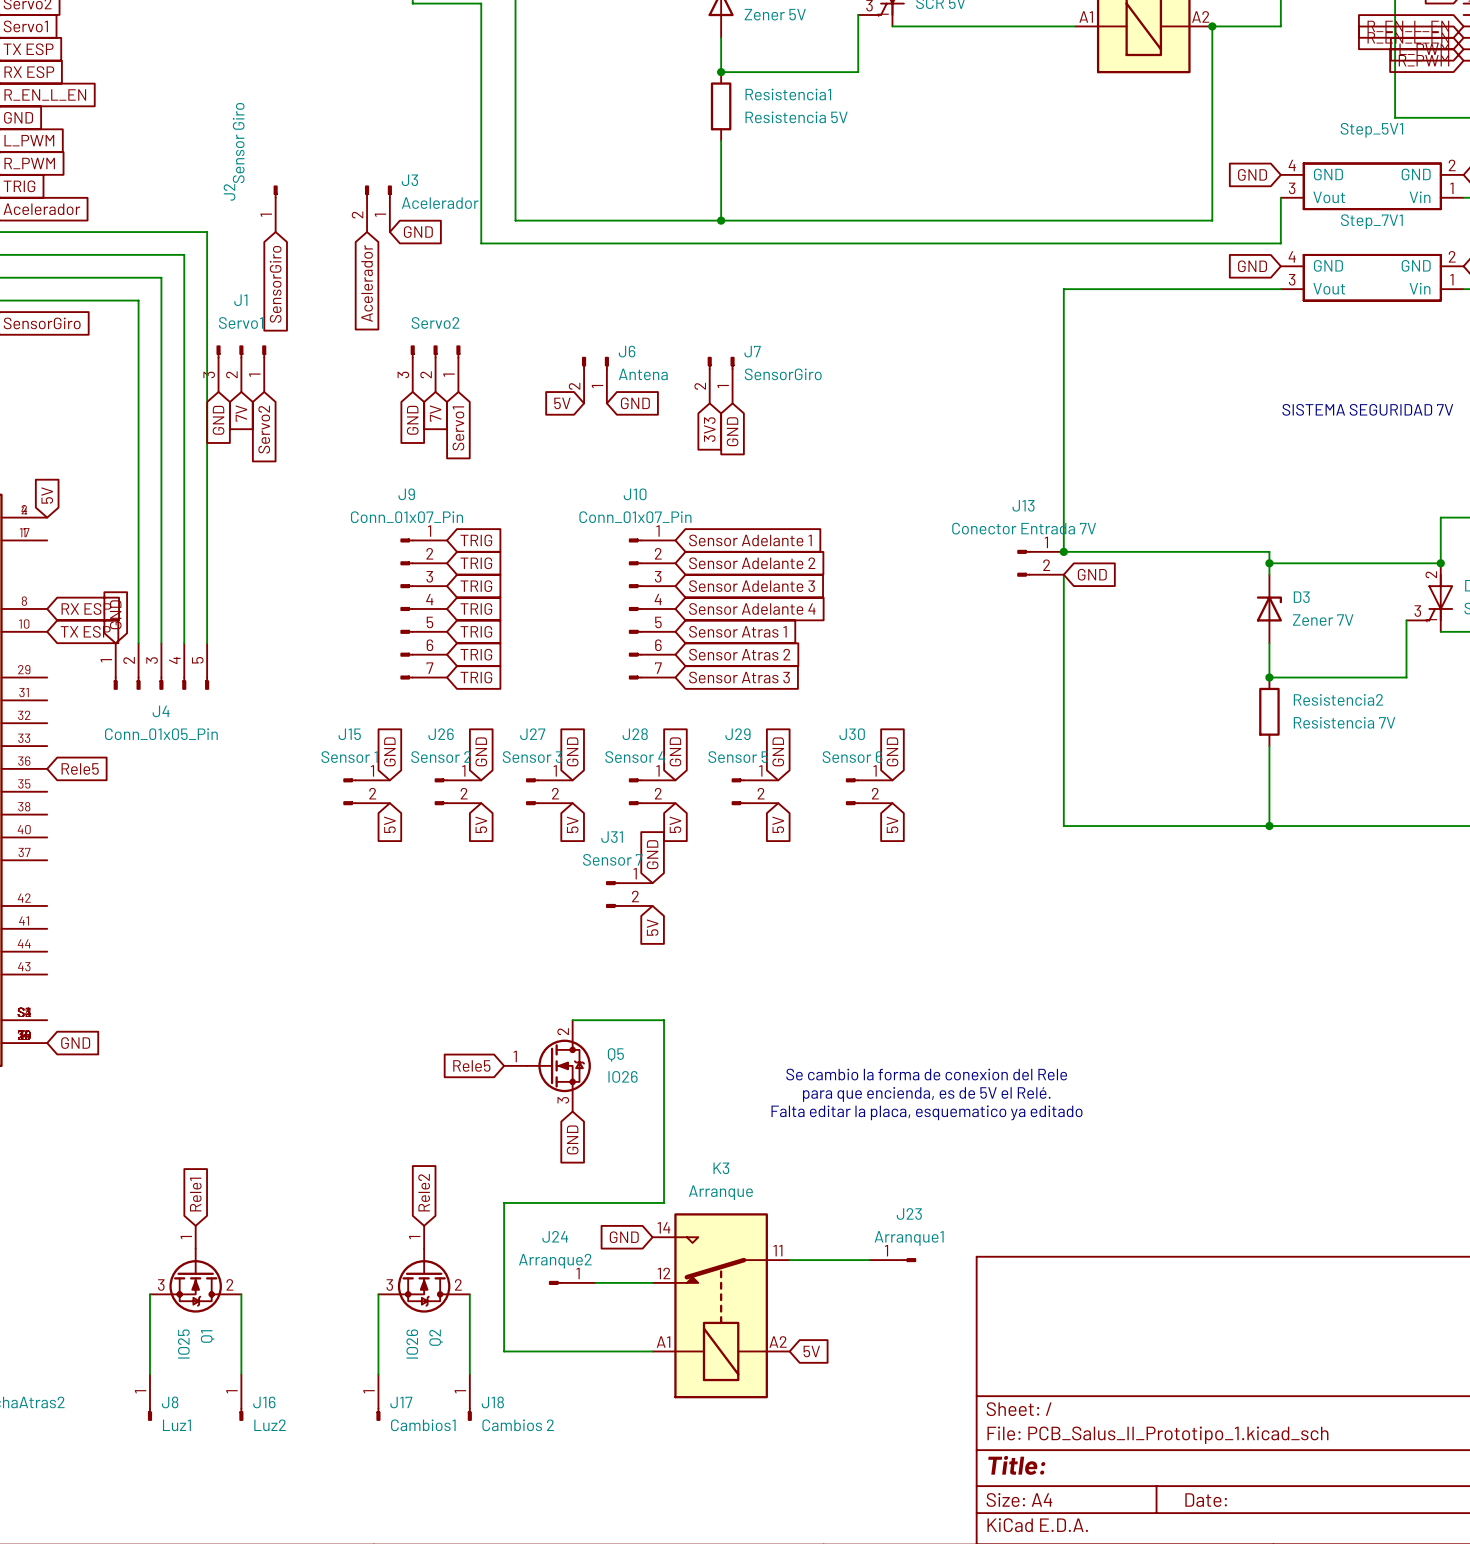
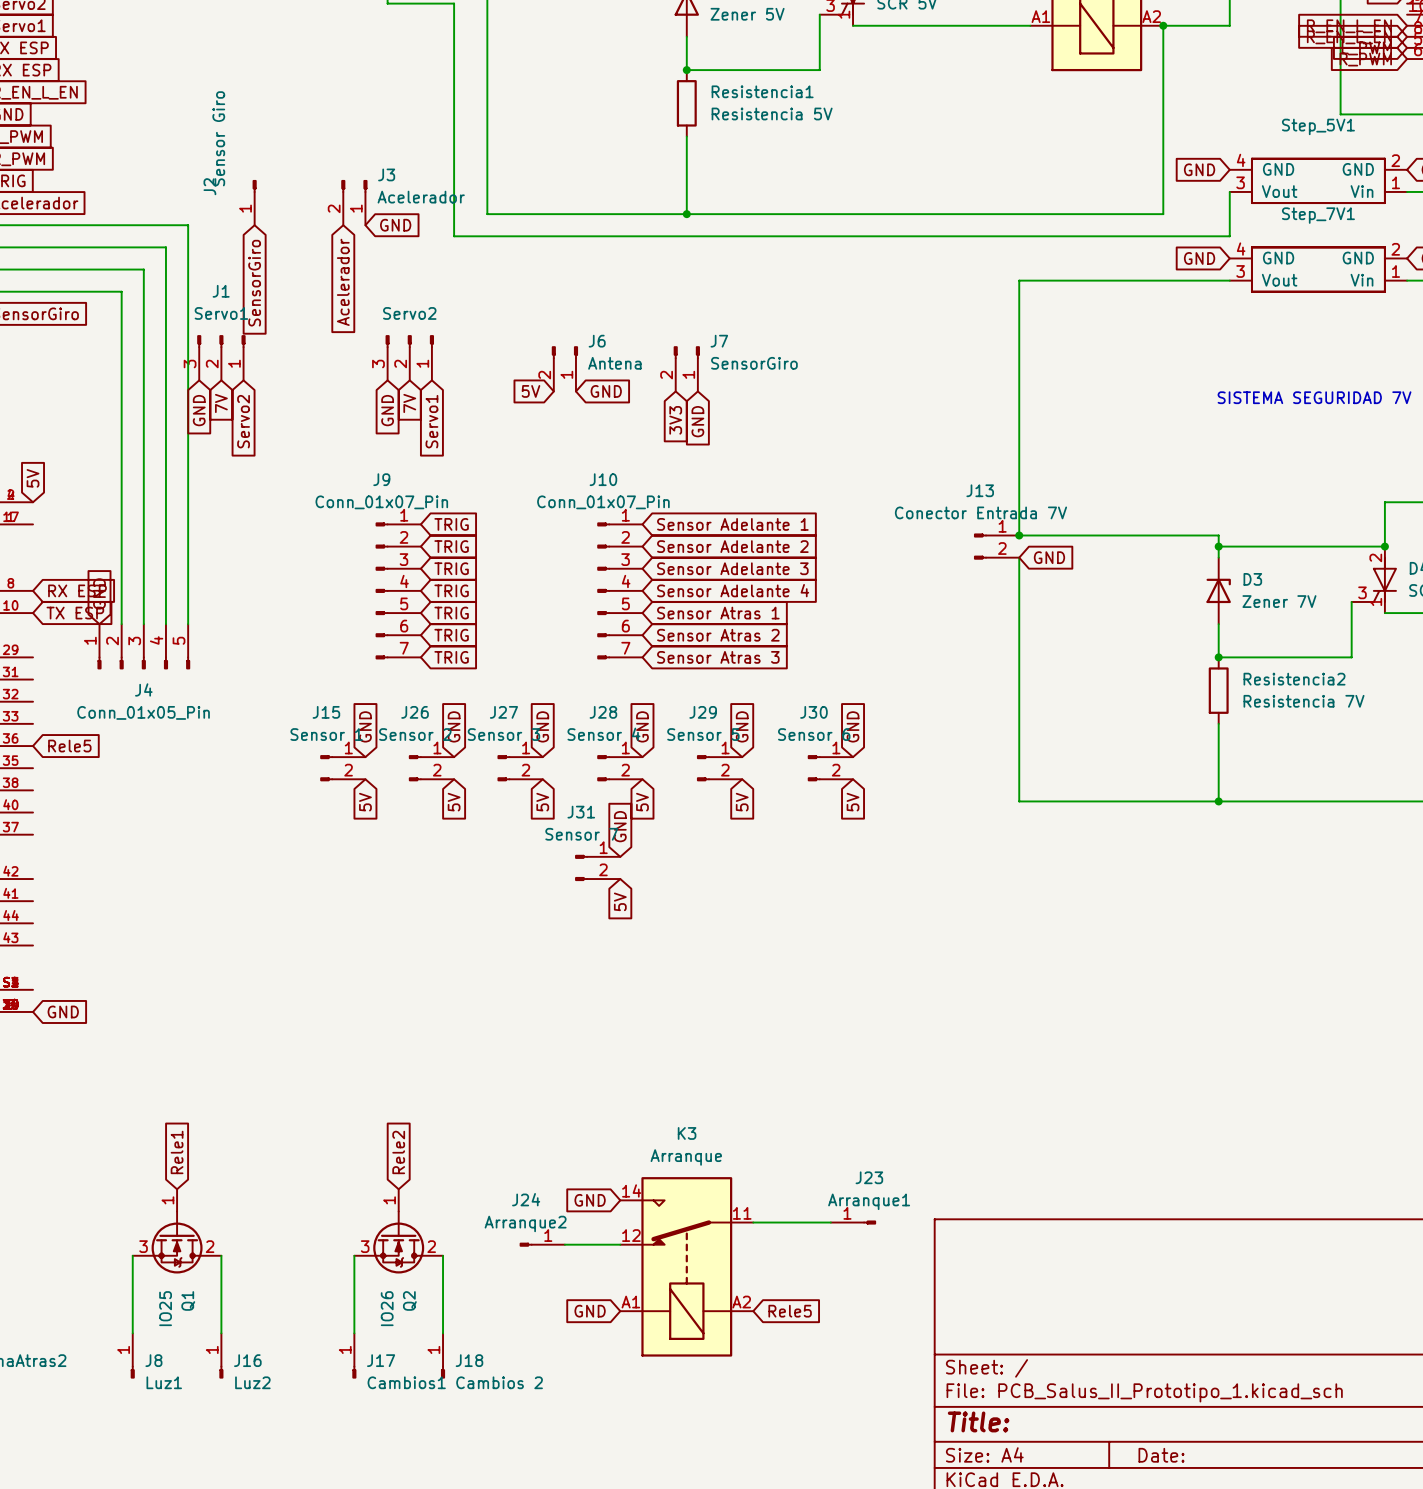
wire: (572, 1020) (664, 1020) (664, 1202) (504, 1202) (504, 1351) (652, 1351) -> none
global label: Rele5 (471, 1065) -> none
Q5: IO26 (547, 1065) -> none
text: Se cambio la forma de conexion del Rele (926, 1074) -> none
text: para que encienda, es de 5V el Relé. (926, 1094) -> none
text: Falta editar la placa, esquematico ya editado (926, 1112) -> none
global label: GND (572, 1139) -> none
global label: none -> GND (590, 1311)
global label: 5V (811, 1351) -> Rele5 (790, 1311)

